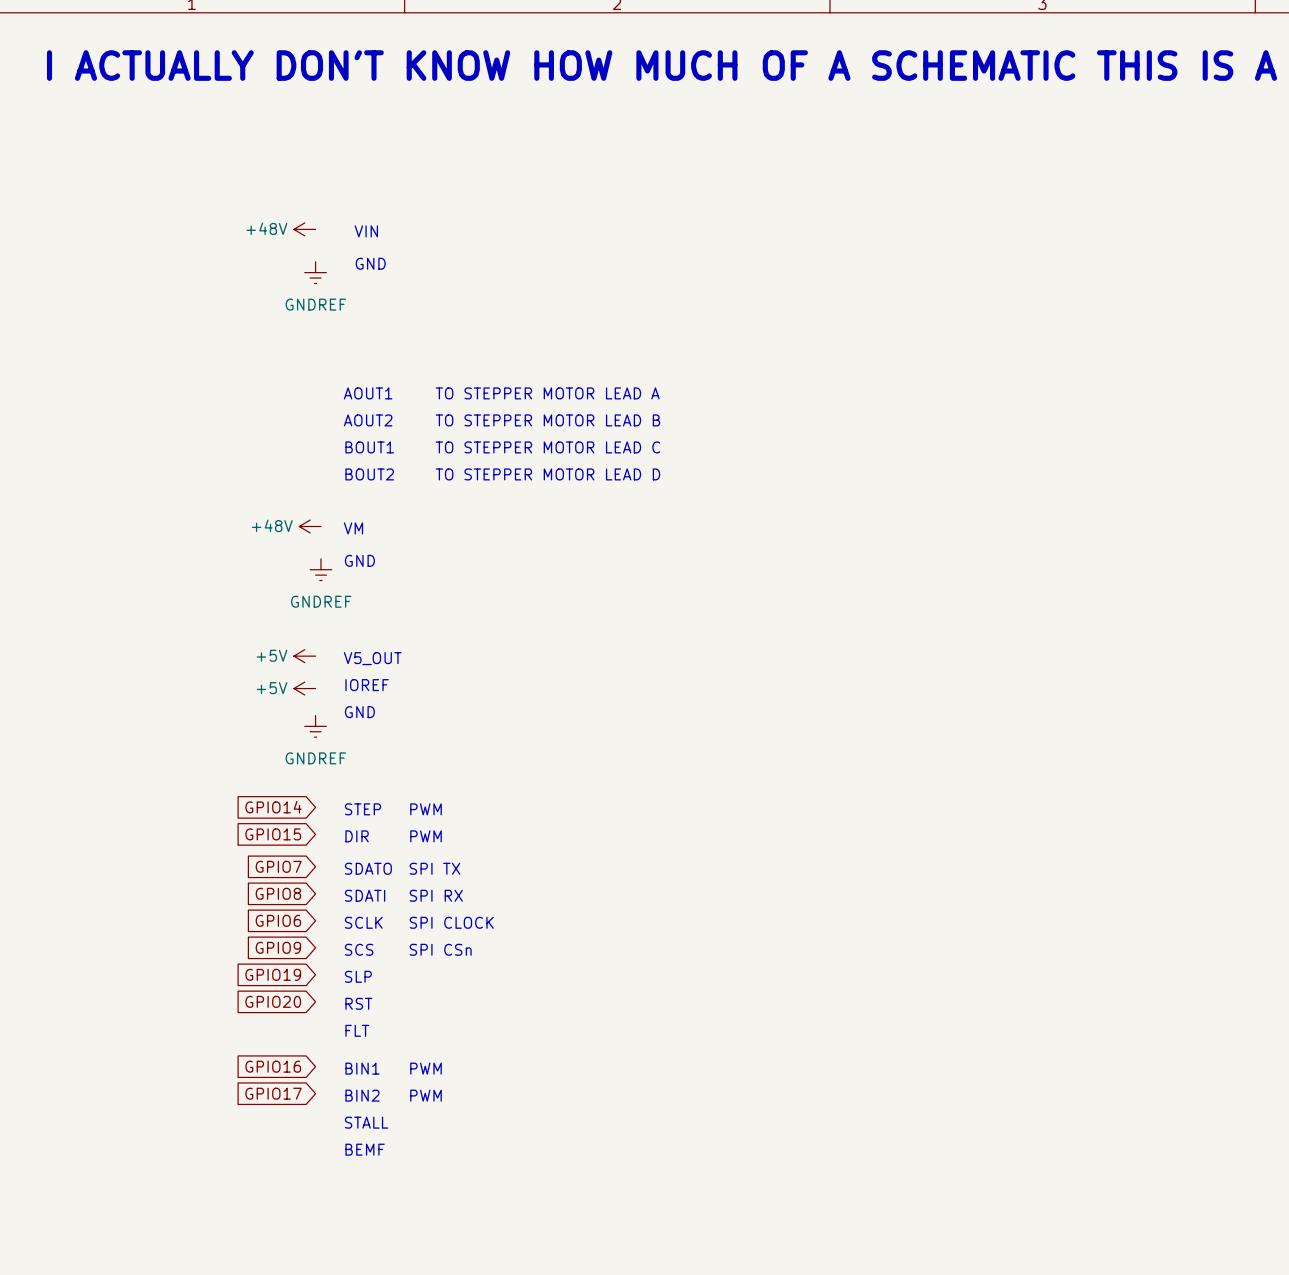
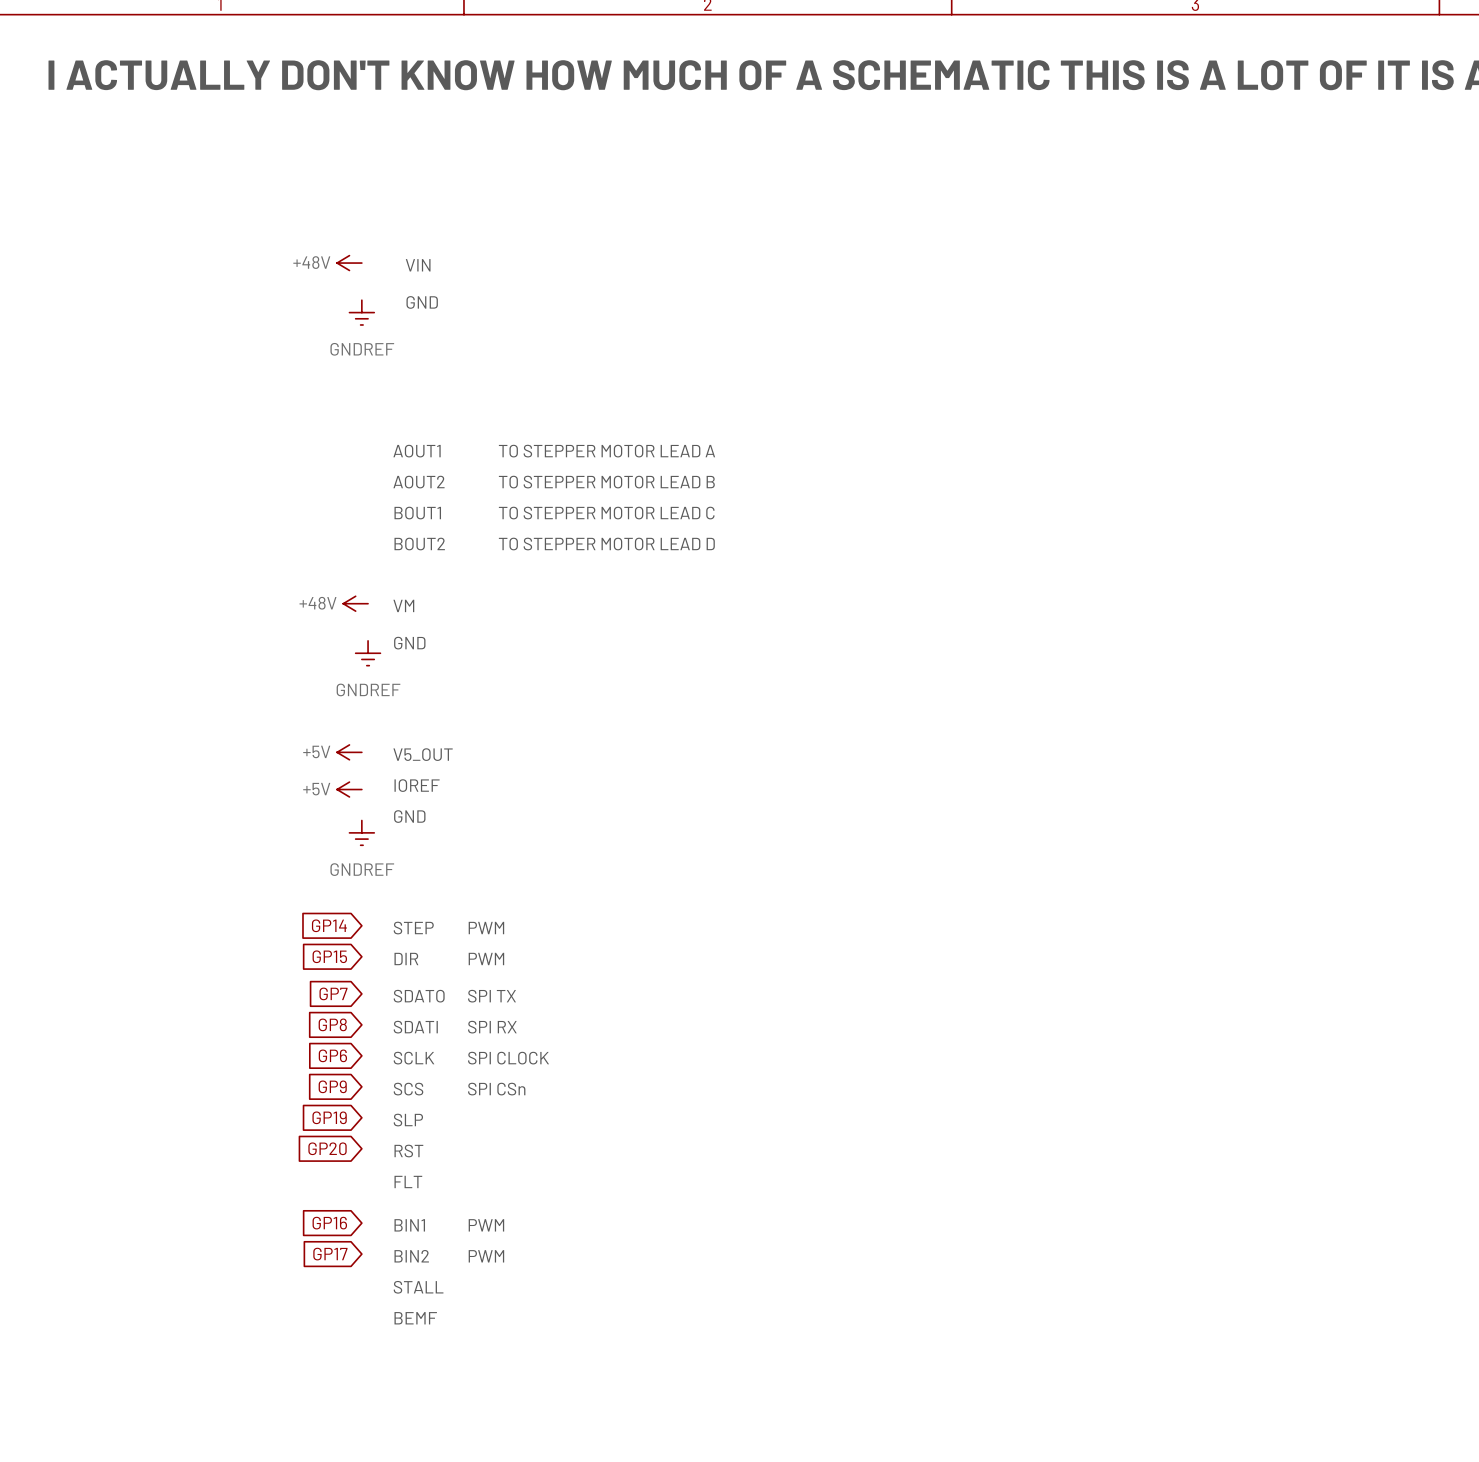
global label: GPIO14 (273, 807) -> GP14 (329, 925)
global label: GPIO15 (273, 834) -> GP15 (329, 956)
global label: GPIO7 (278, 866) -> GP7 (333, 993)
global label: GPIO8 (278, 893) -> GP8 (332, 1024)
global label: GPIO6 (278, 920) -> GP6 (332, 1055)
global label: GPIO9 (278, 947) -> GP9 (332, 1086)
global label: GPIO19 (273, 974) -> GP19 (329, 1117)
global label: GPIO20 (273, 1001) -> GP20 (327, 1148)
global label: GPIO16 (273, 1066) -> GP16 (329, 1223)
global label: GPIO17 (273, 1093) -> GP17 (330, 1254)

